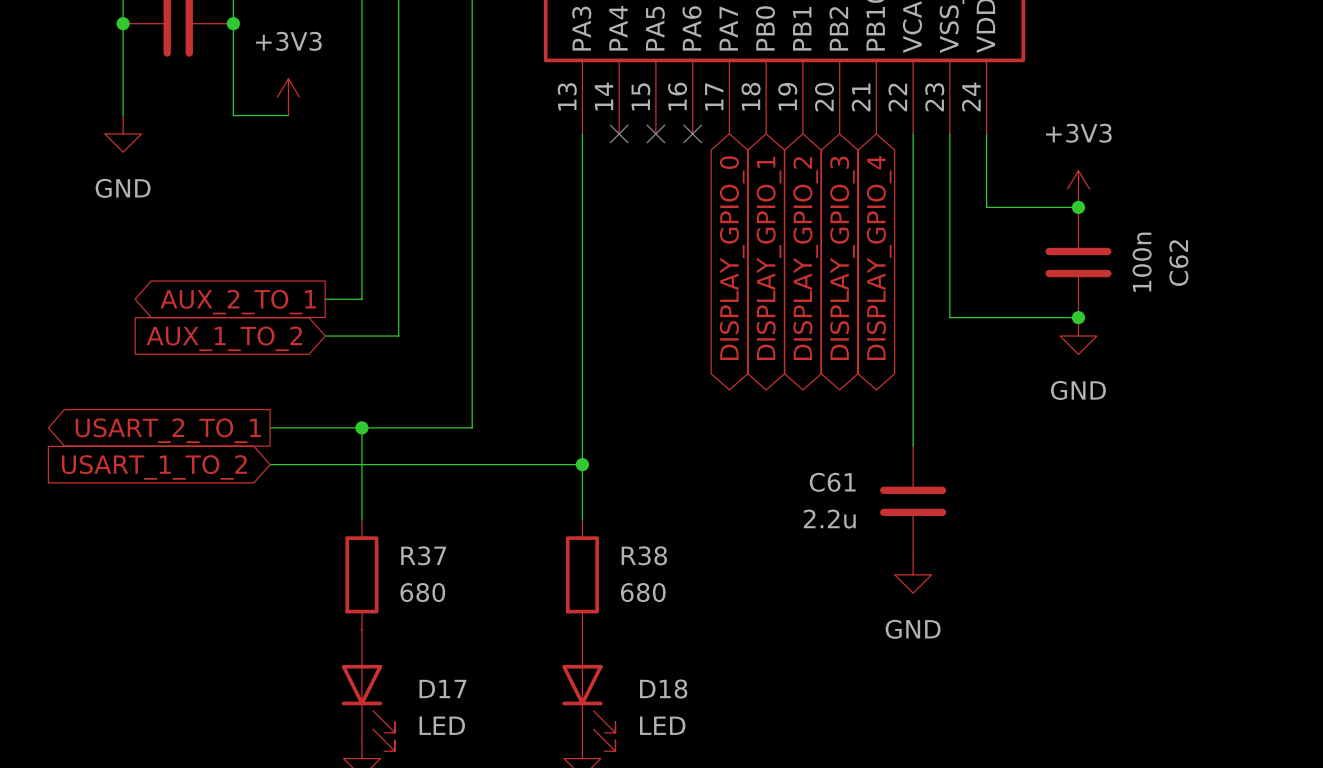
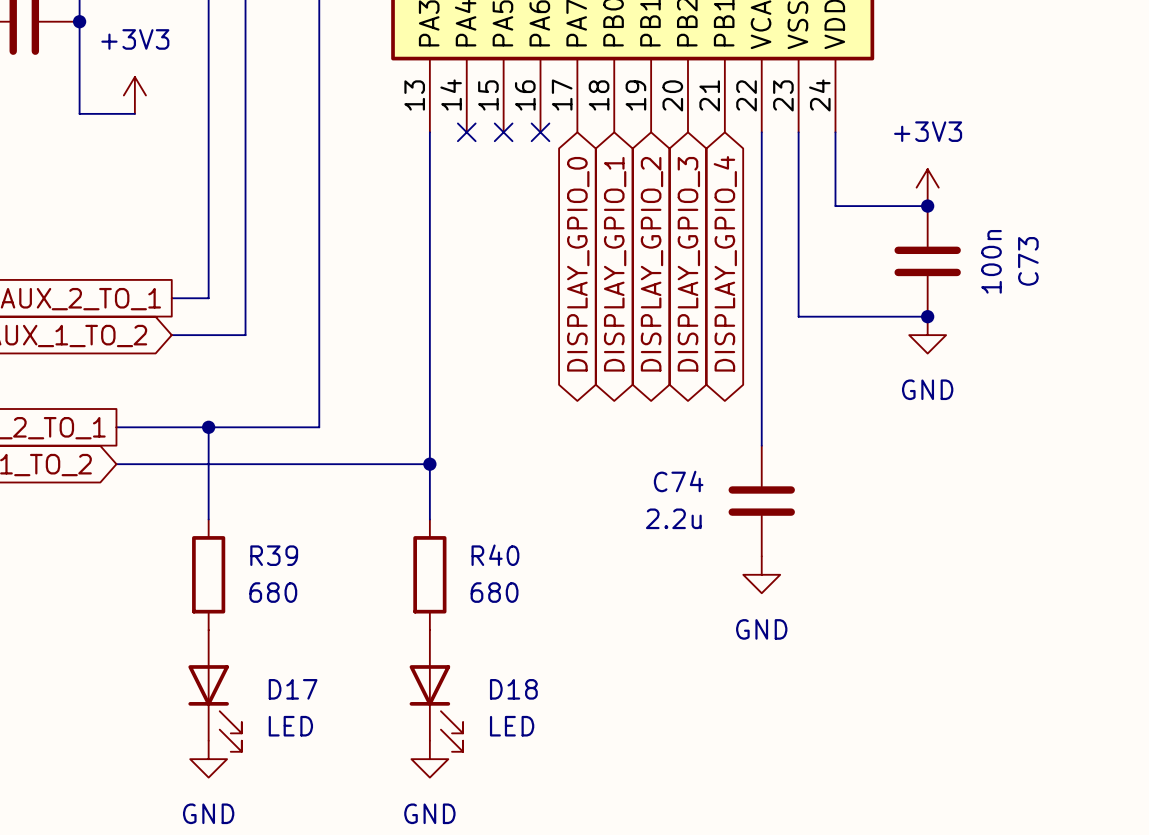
C62 name: C62 (1178, 263) -> C73 (1028, 261)
C61 name: C61 (832, 482) -> C74 (678, 481)
R37 name: R37 (423, 555) -> R39 (274, 555)
R38 name: R38 (644, 555) -> R40 (495, 555)

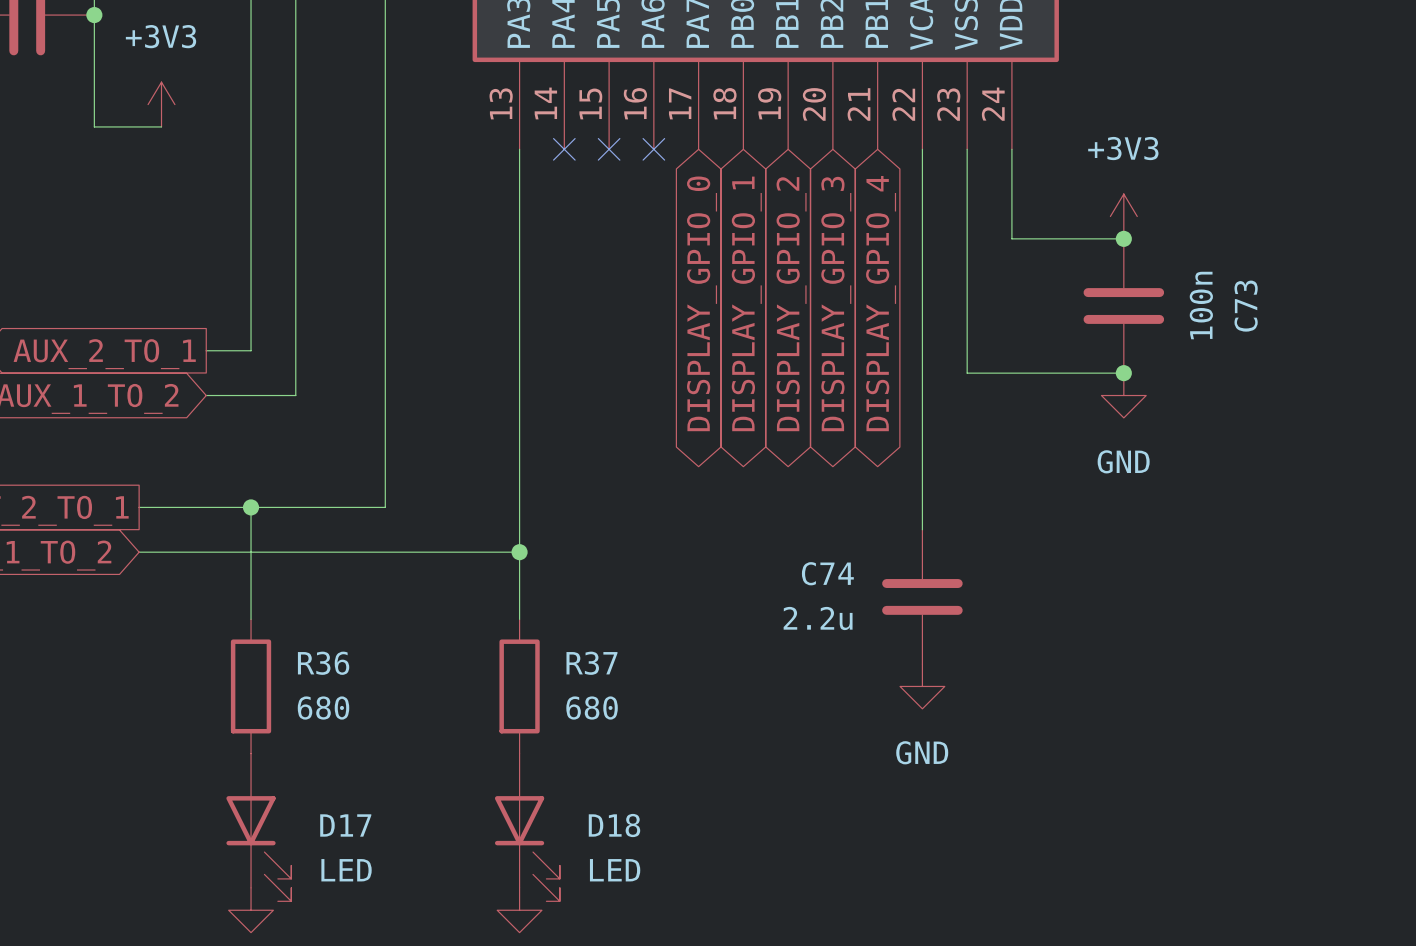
R39 name: R39 (274, 555) -> R36 (323, 663)
R40 name: R40 (495, 555) -> R37 (591, 663)

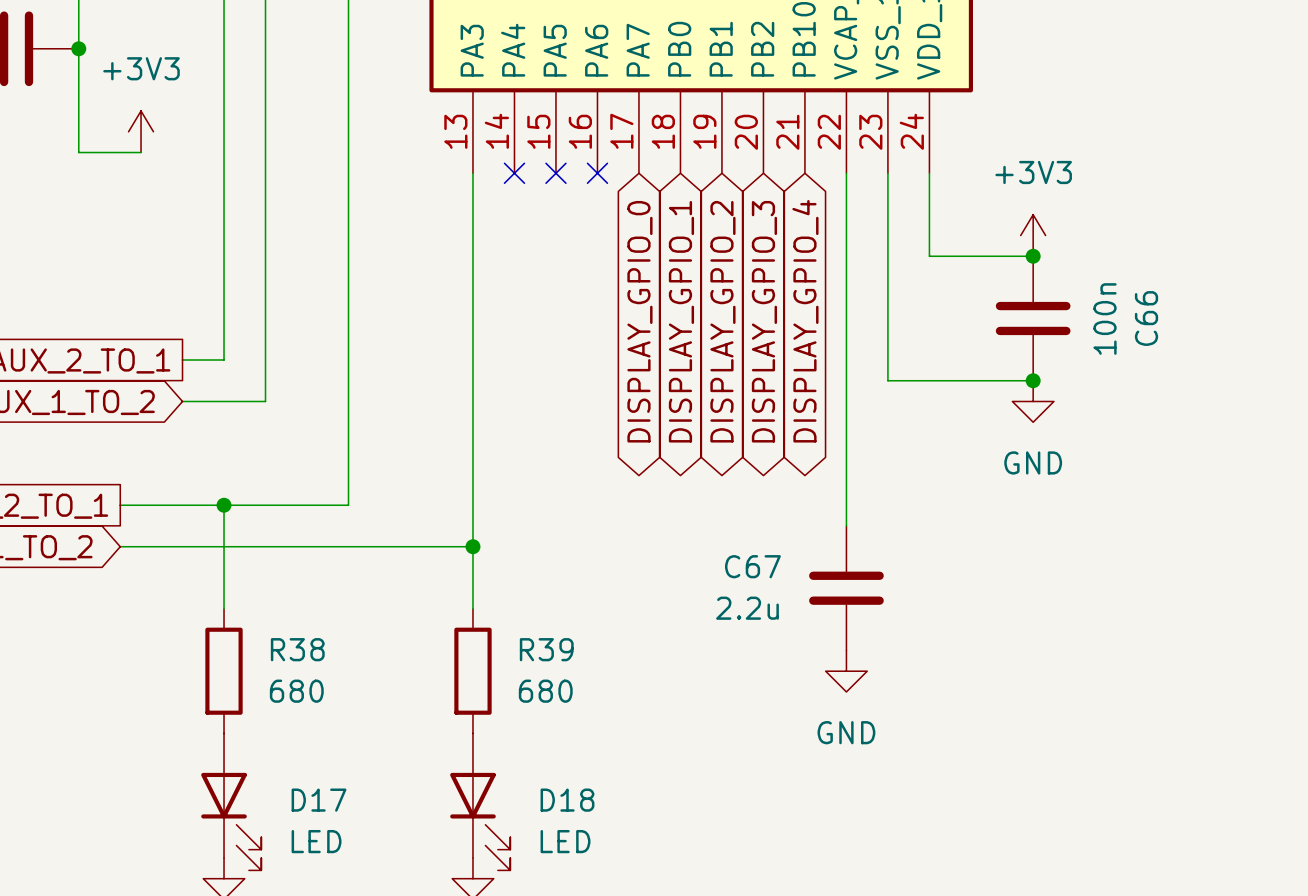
C73 name: C73 (1246, 306) -> C66 (1146, 318)
C74 name: C74 (827, 573) -> C67 (752, 566)
R36 name: R36 (323, 663) -> R38 (297, 649)
R37 name: R37 (591, 663) -> R39 (546, 649)

